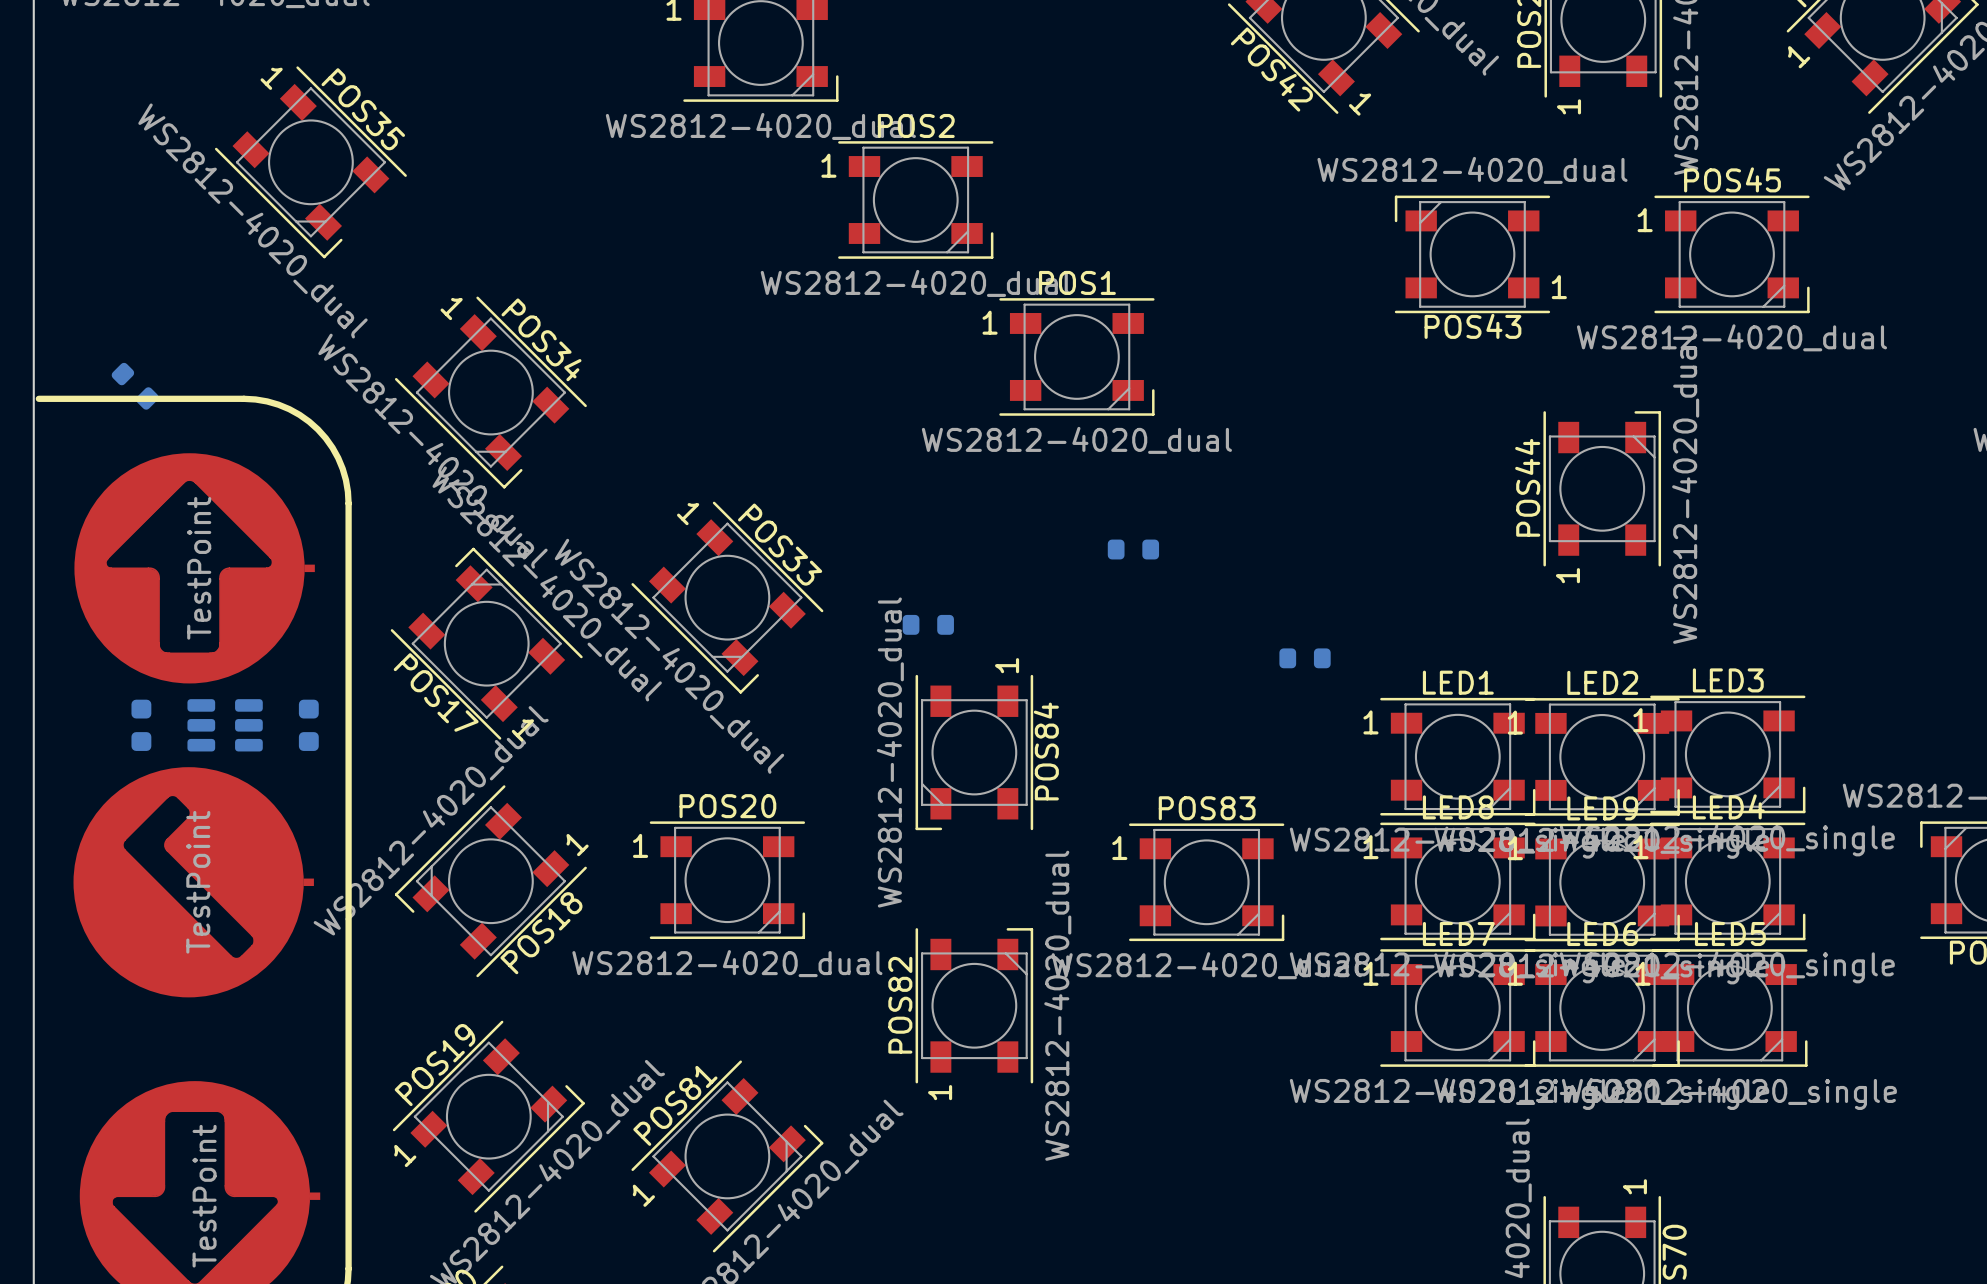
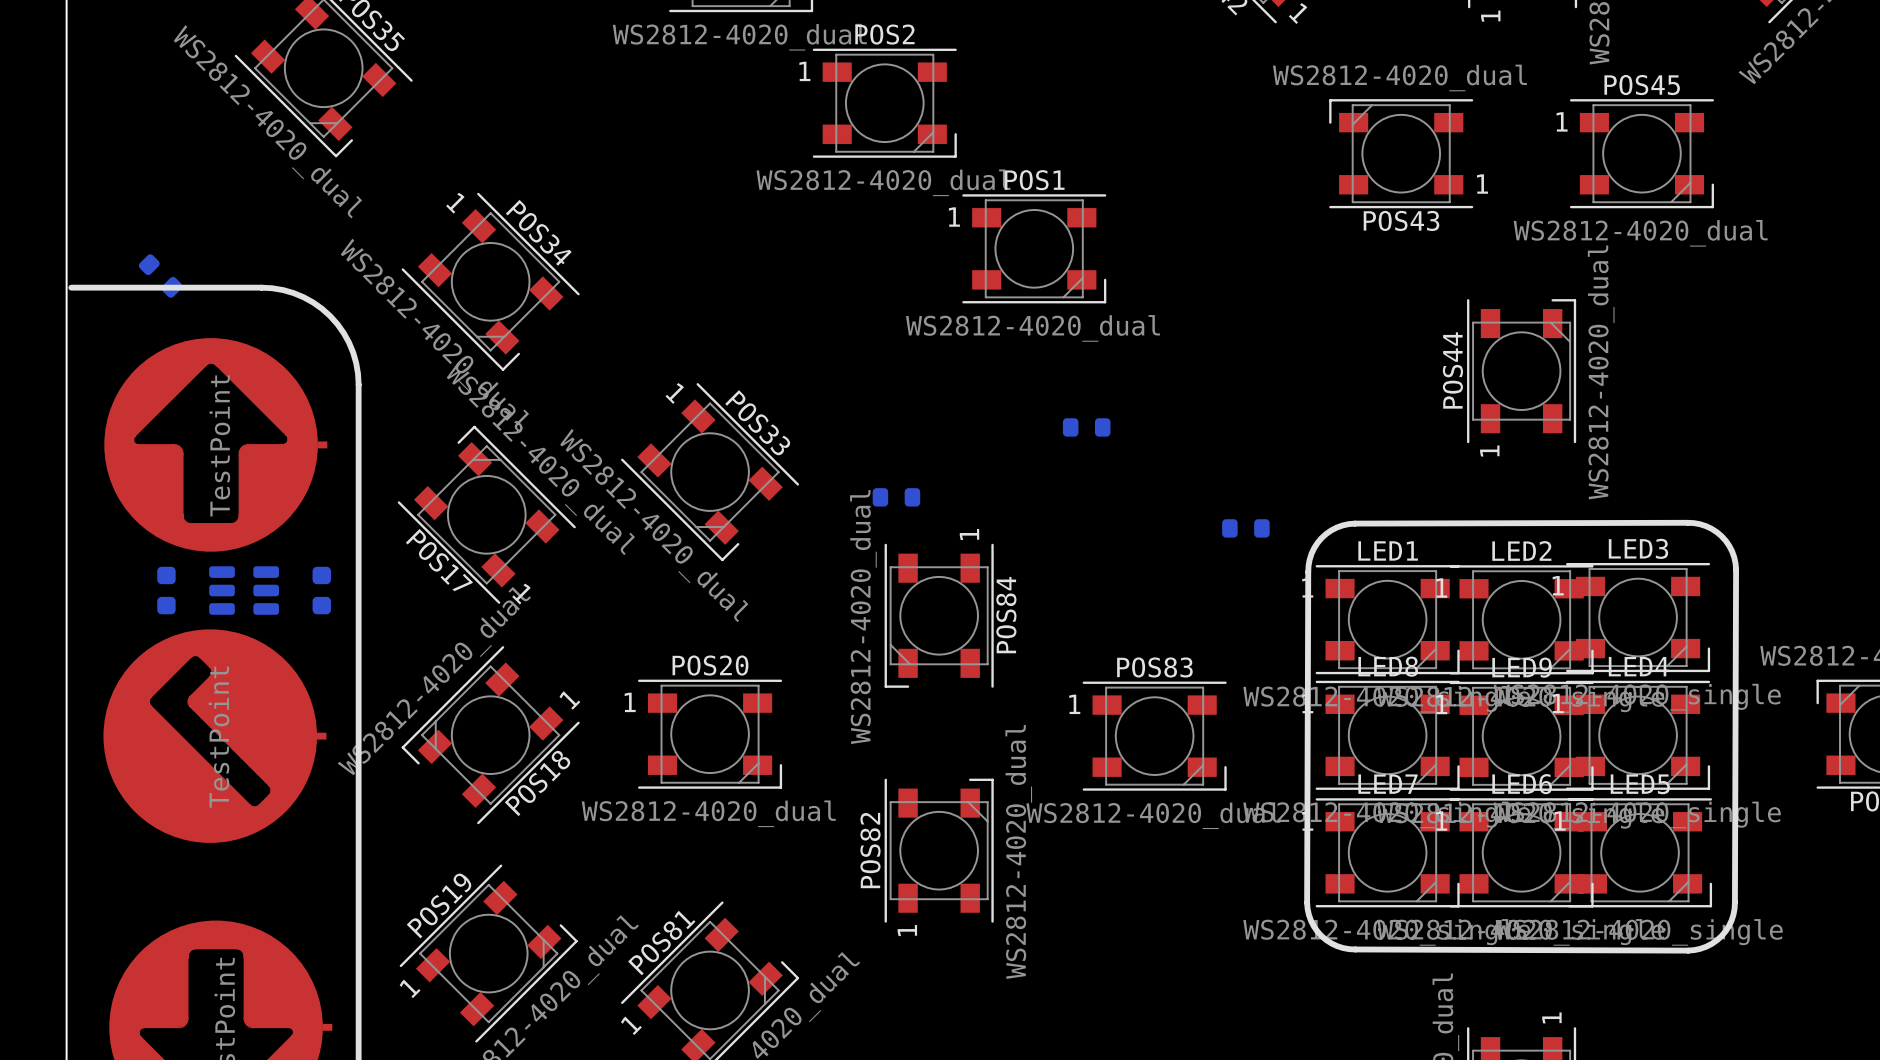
line: none -> (1687, 522) (1355, 523) (1336, 527) (1321, 538) (1311, 553) (1308, 571) (1307, 902) (1311, 920) (1321, 936) (1337, 946) (1355, 949) (1688, 950) (1706, 946) (1721, 936) (1731, 920) (1734, 902) (1736, 569) (1732, 551) (1721, 536) (1705, 526) (1687, 522)

